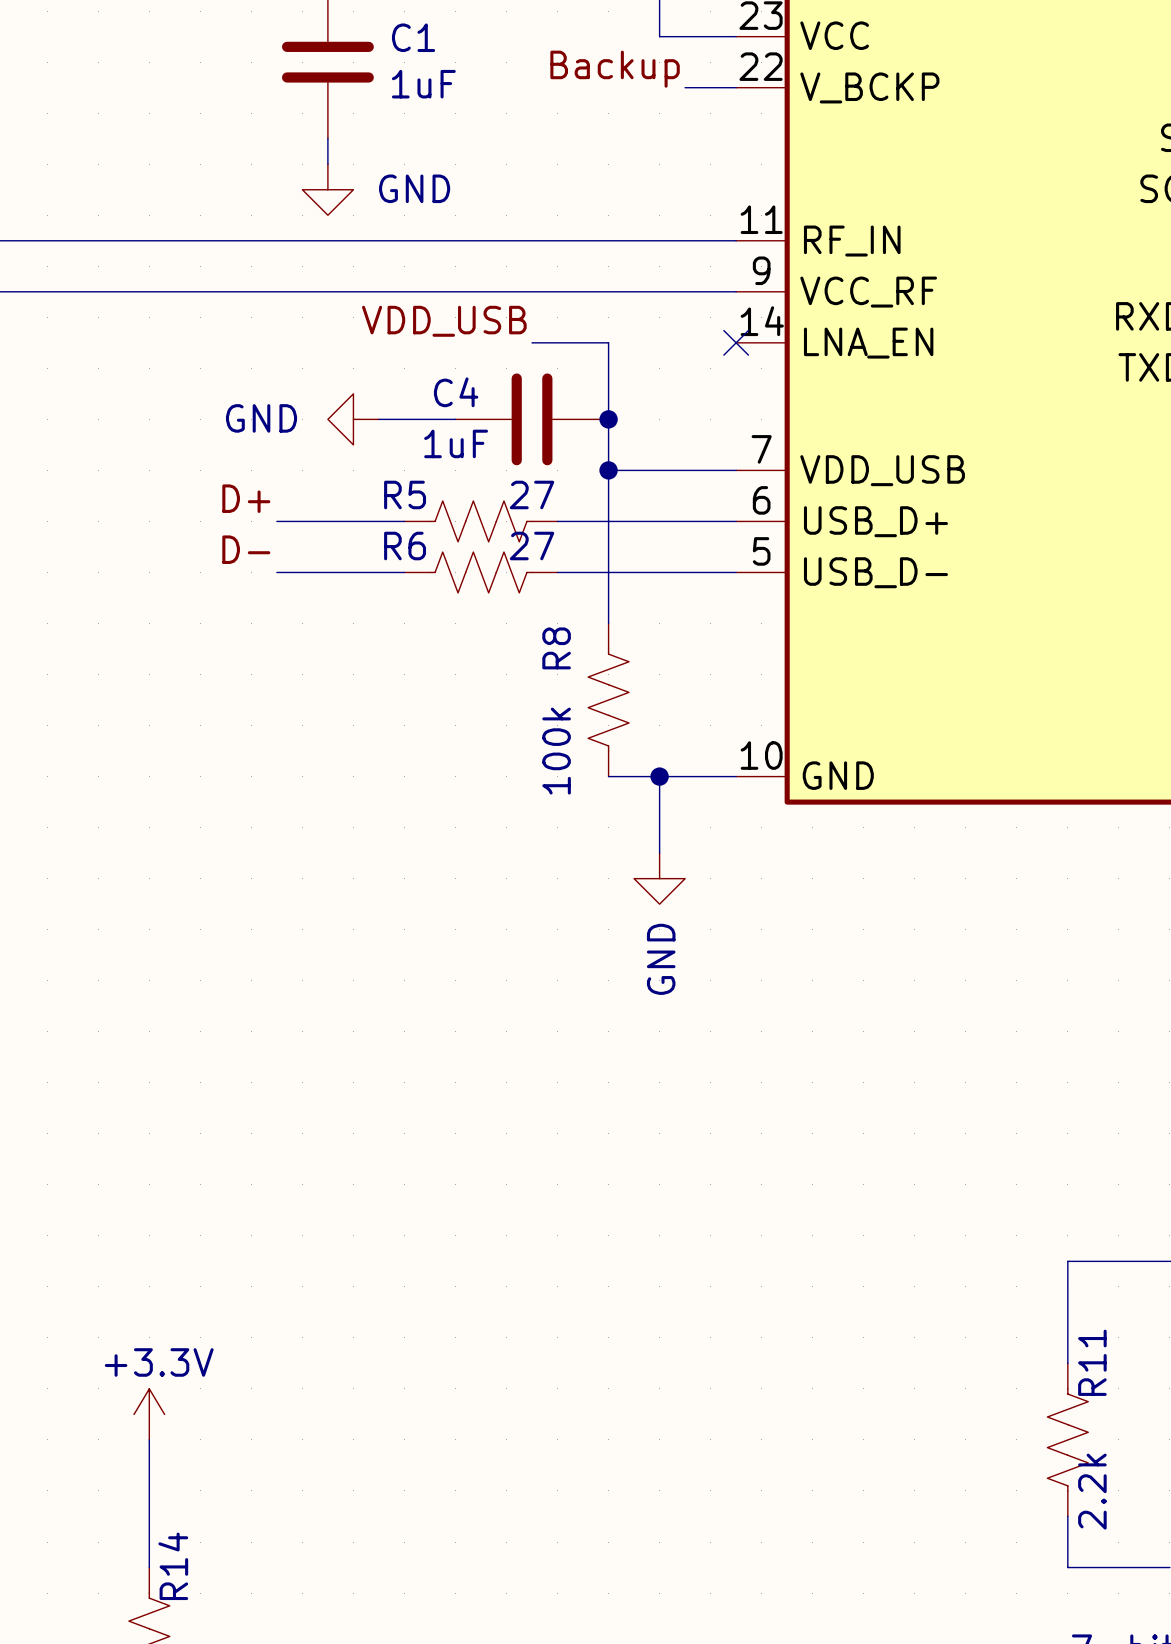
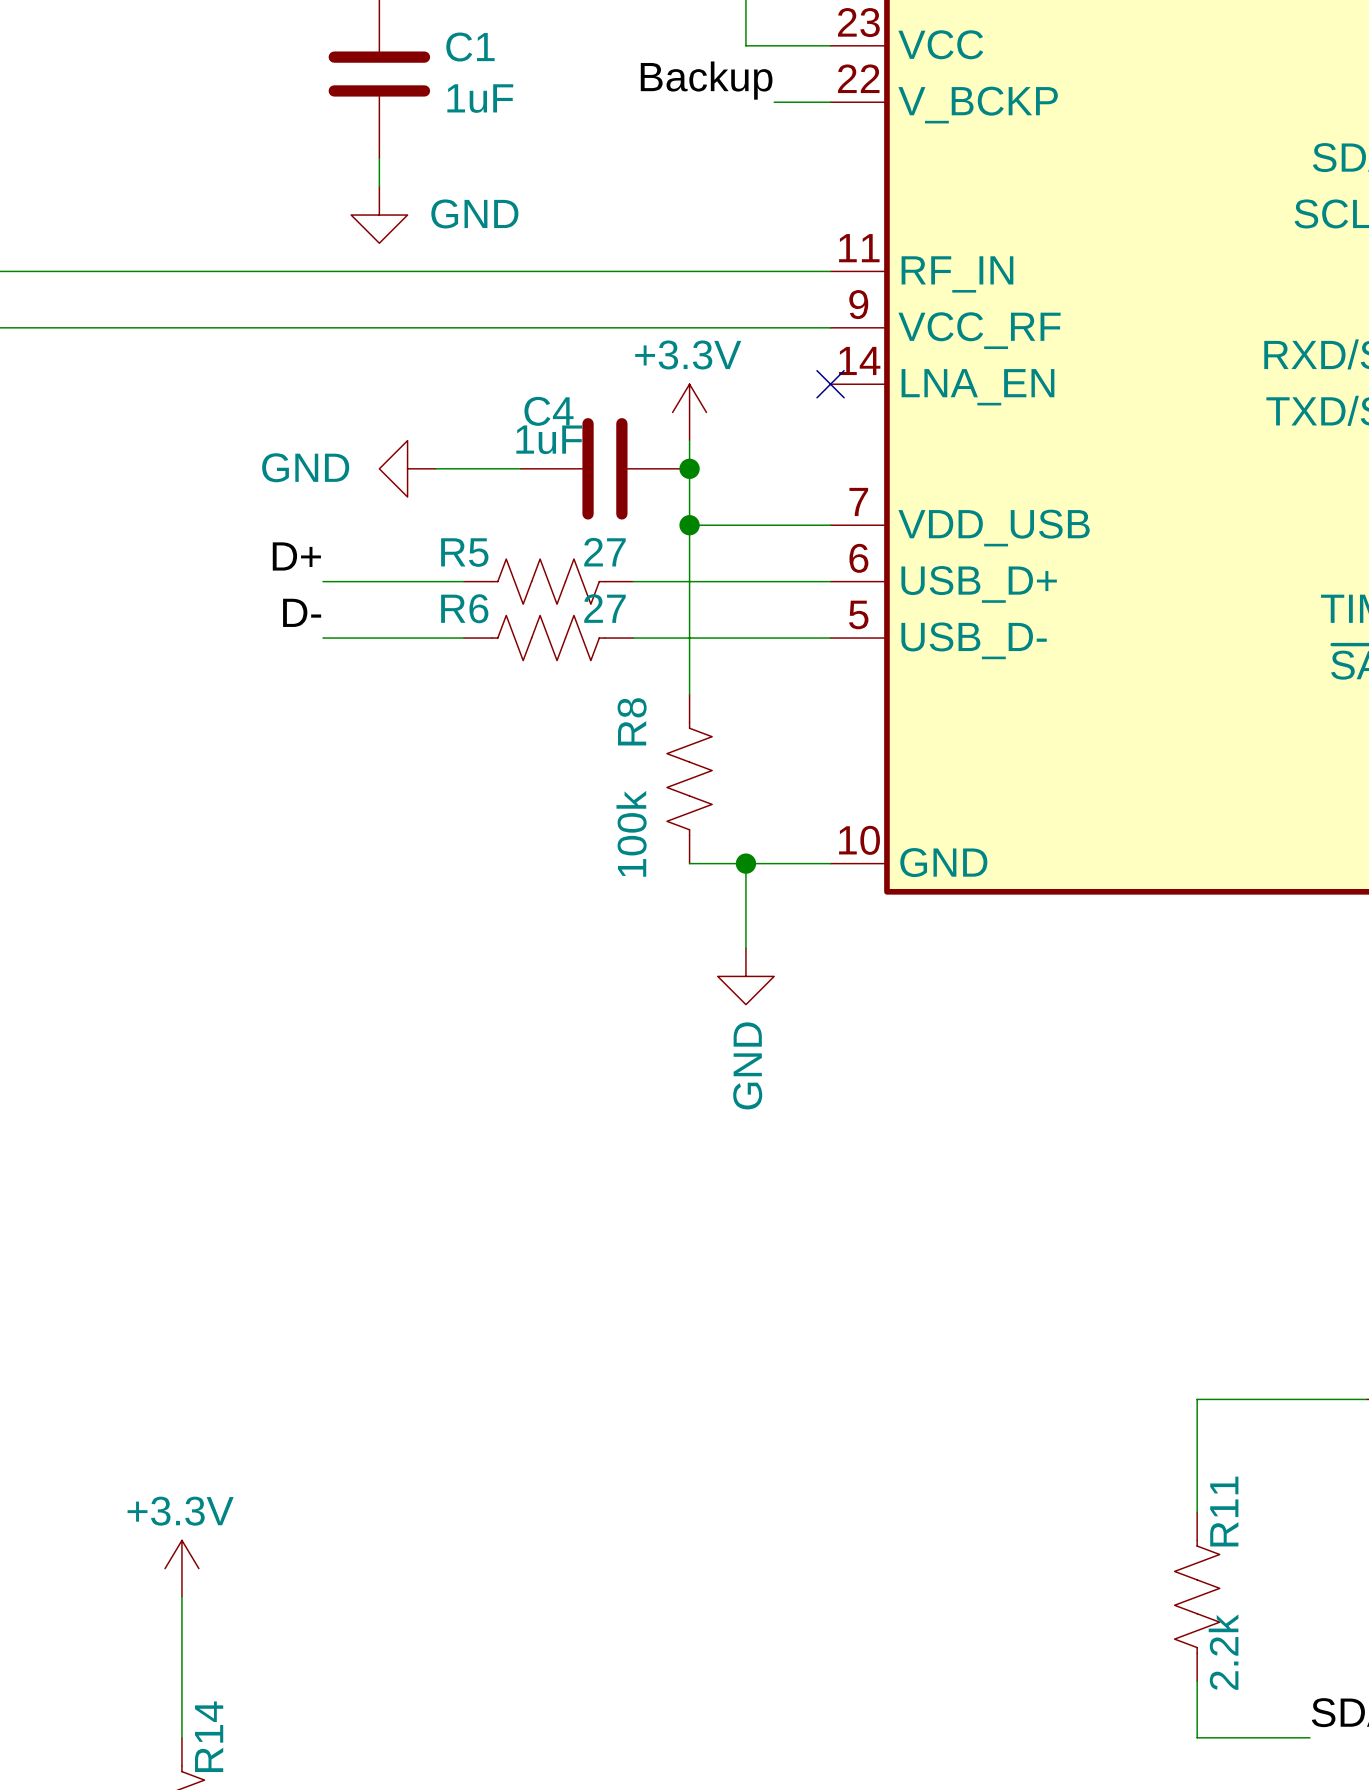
label: VDD_USB (444, 321) -> none
wire: (532, 342) (608, 342) (608, 393) -> none
power symbol: none -> +3.3V (689, 412)
C4 name position: C4 (456, 392) -> C4 (549, 411)
C4 value position: 1uF (456, 443) -> 1uF (549, 439)

